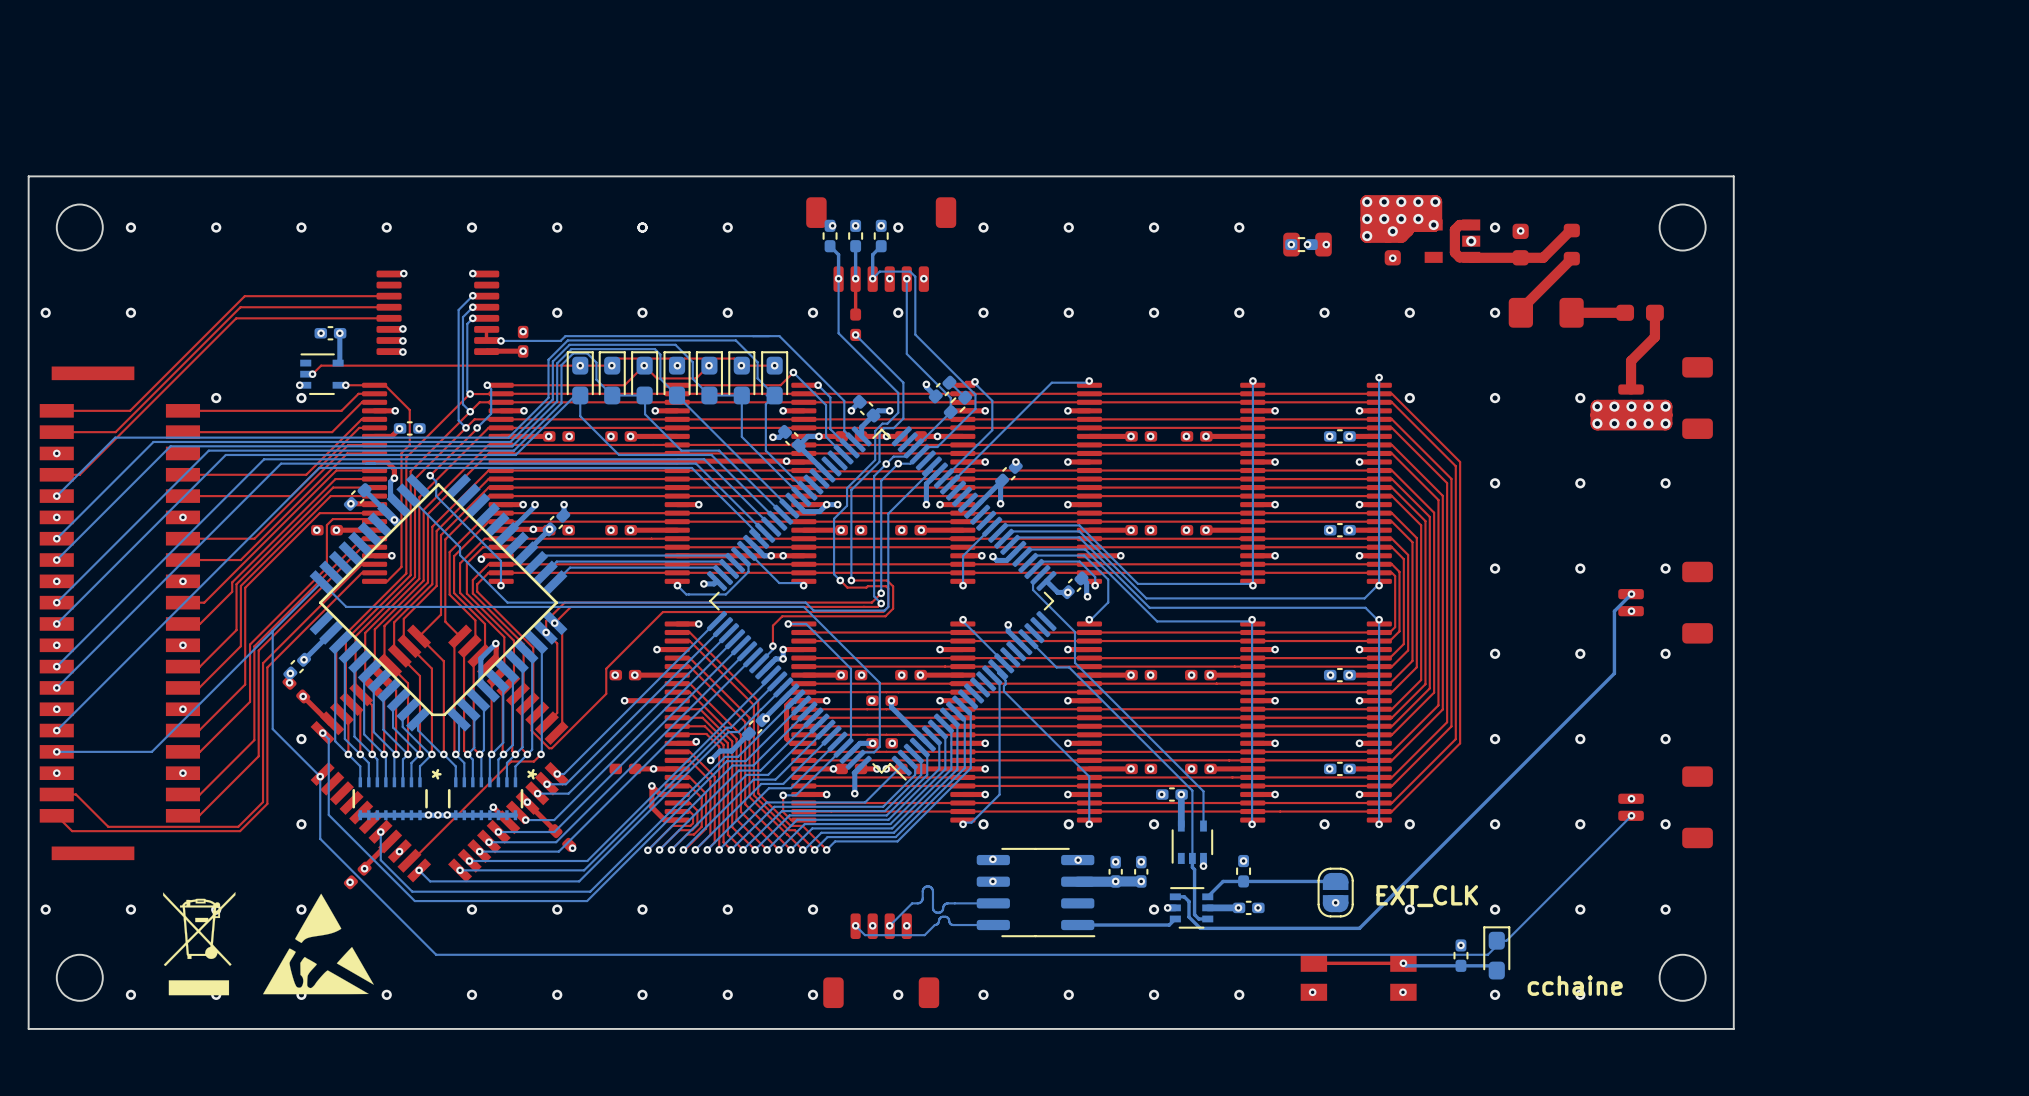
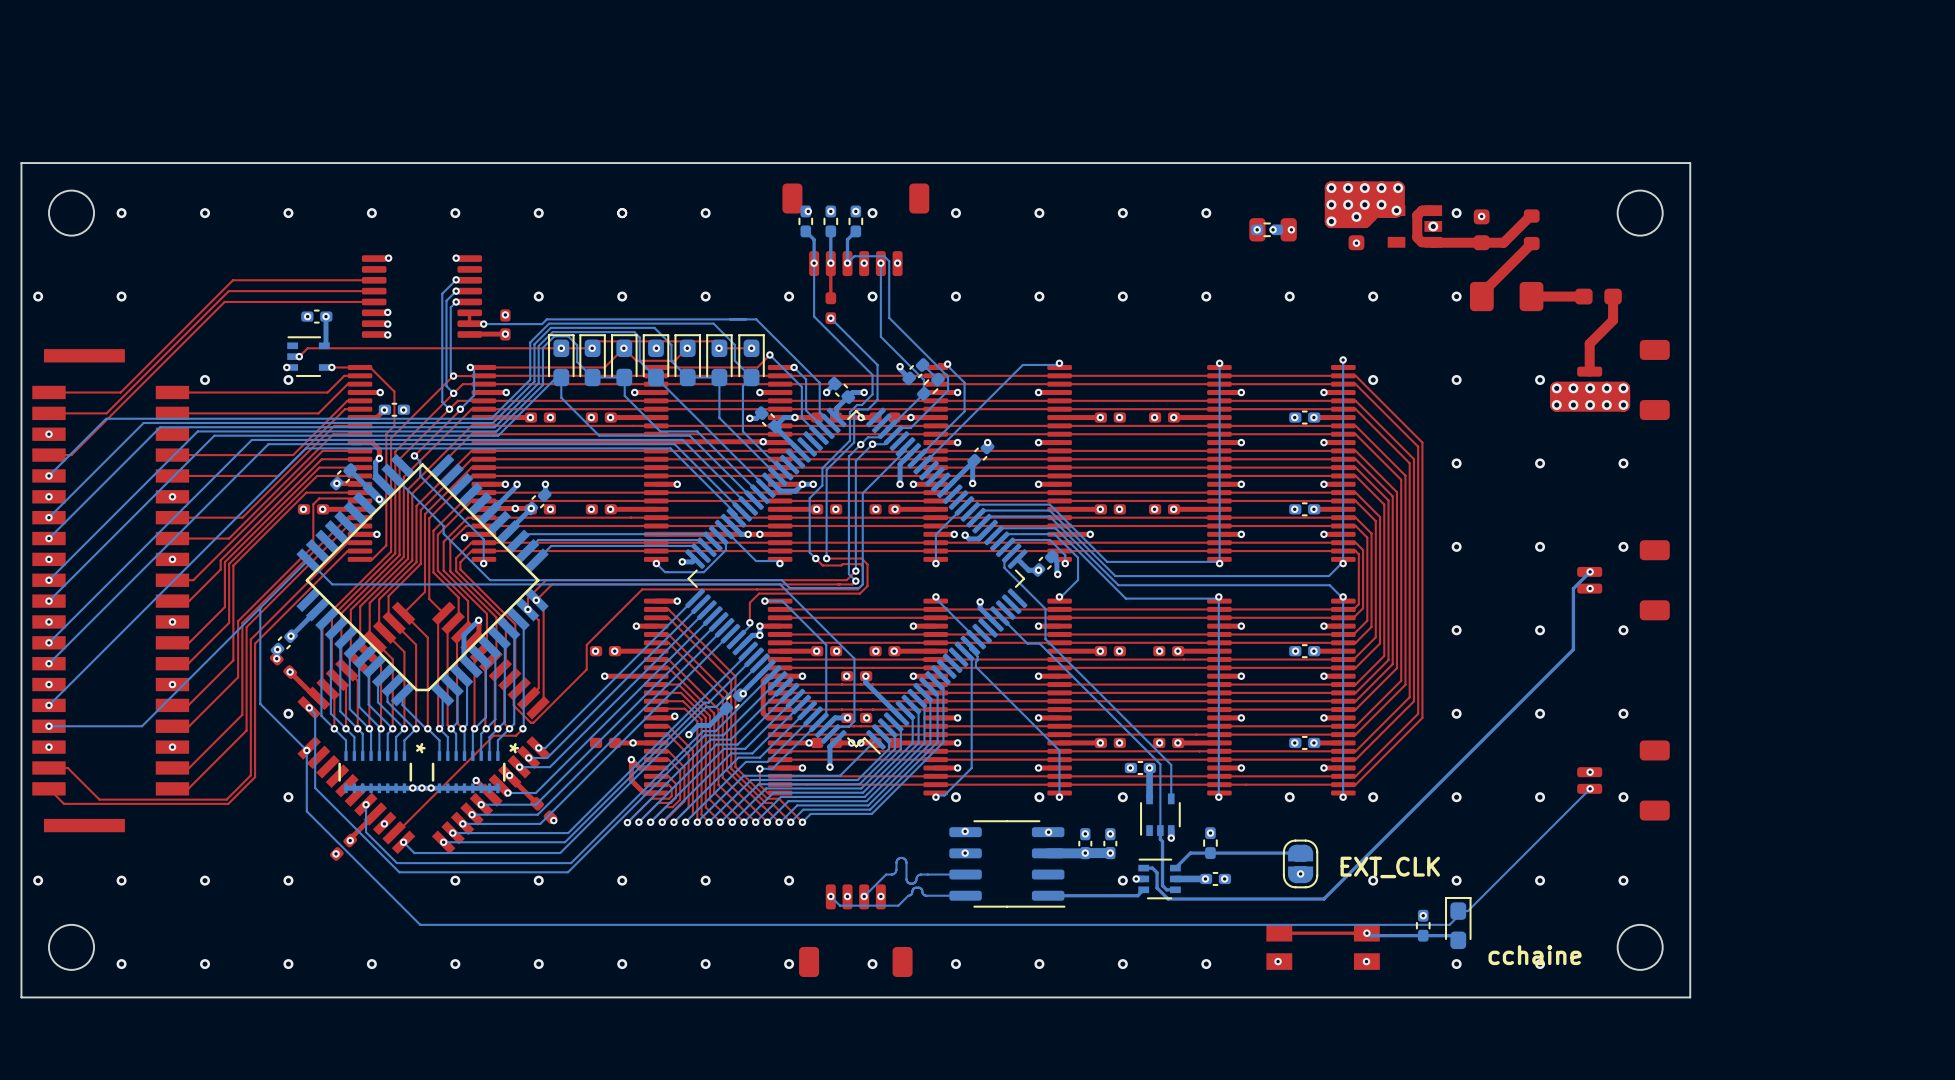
drawing: [163, 892, 236, 996] -> none
drawing: [263, 893, 374, 995] -> none

